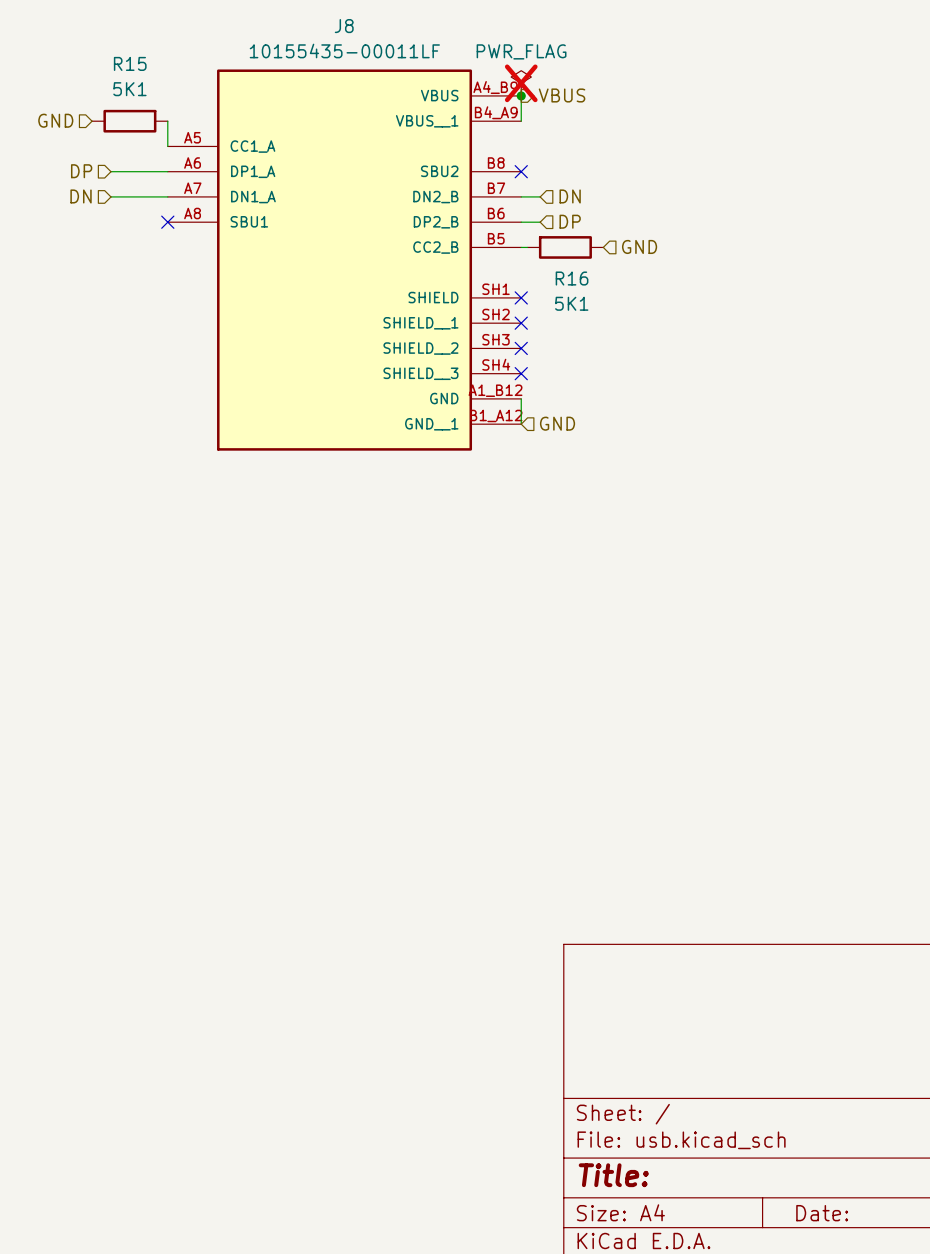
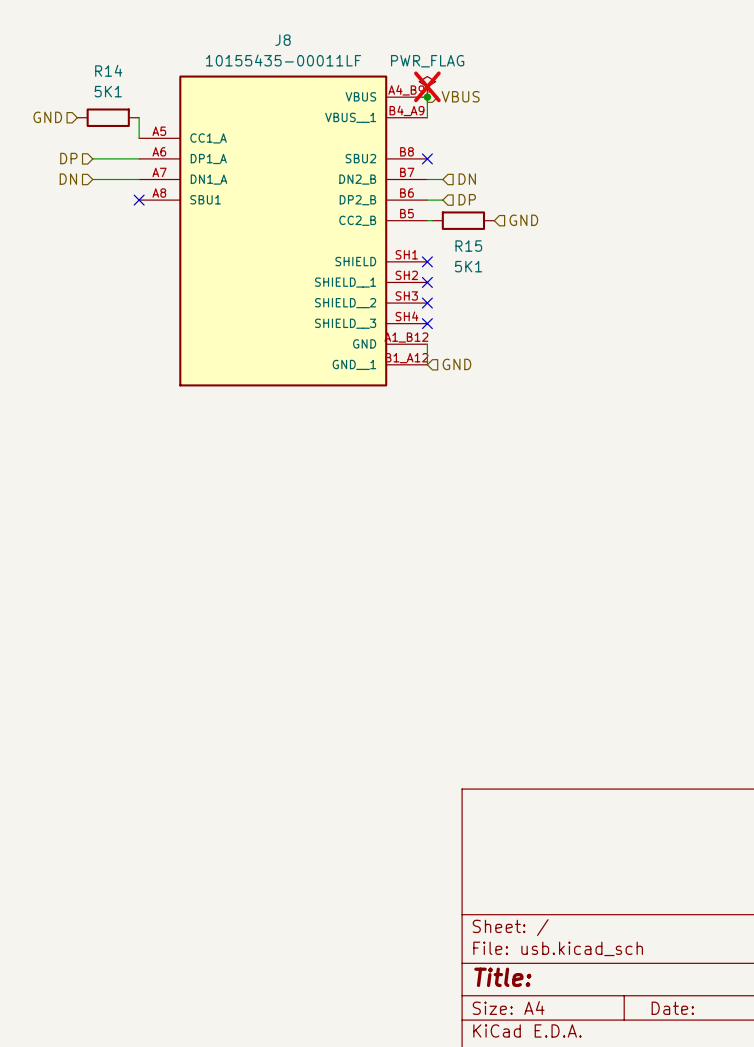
R15 name: R15 (130, 63) -> R14 (108, 70)
R16 name: R16 (572, 278) -> R15 (468, 246)

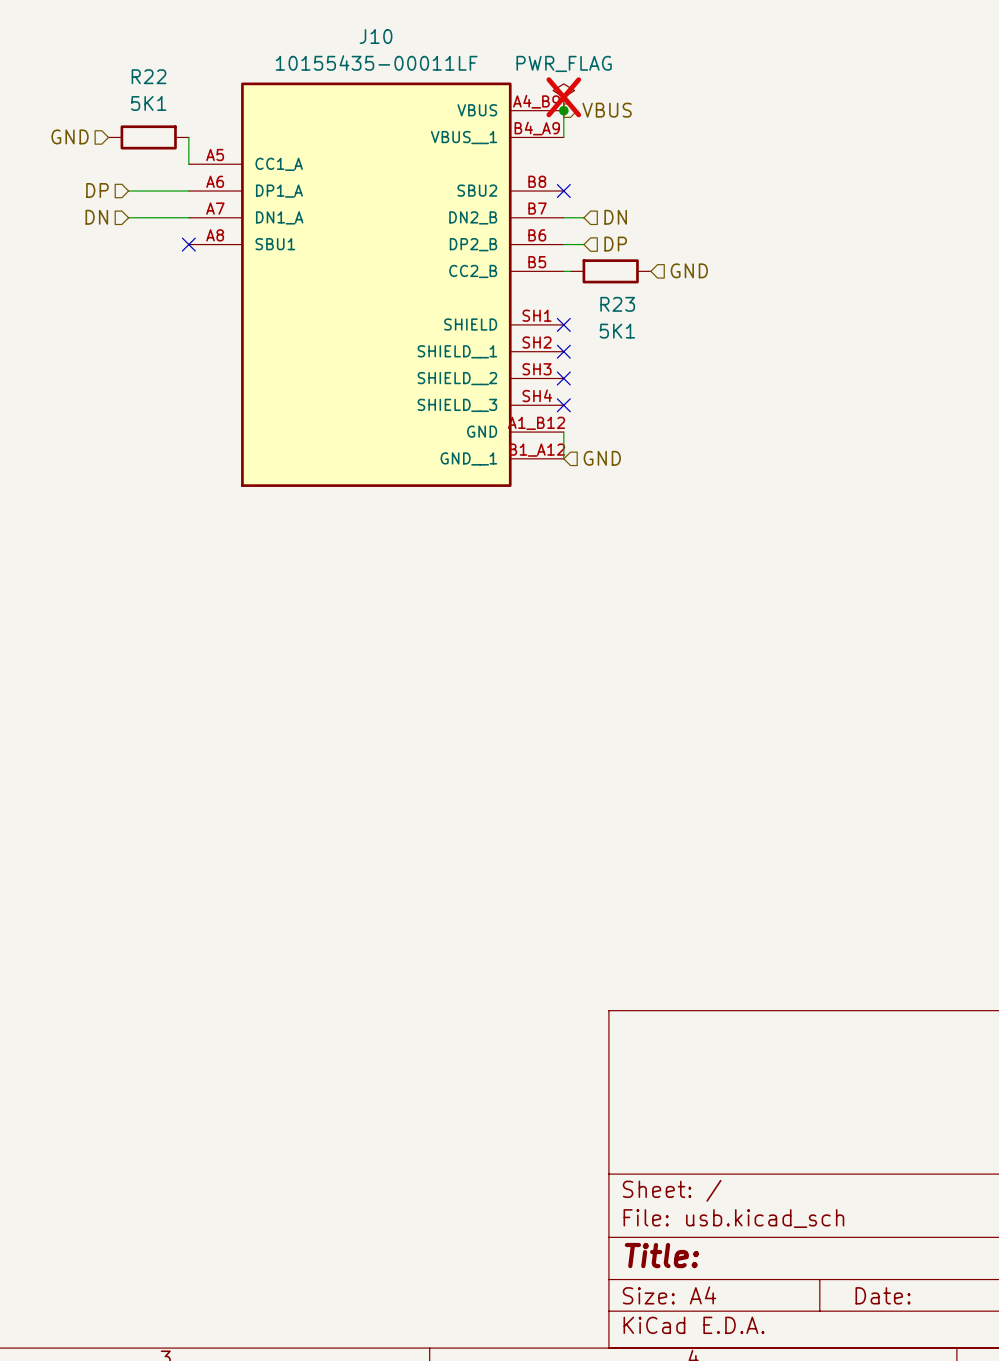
J8 name: J8 (283, 40) -> J10 (376, 36)
R14 name: R14 (108, 70) -> R22 (149, 76)
R15 name: R15 (468, 246) -> R23 (617, 304)

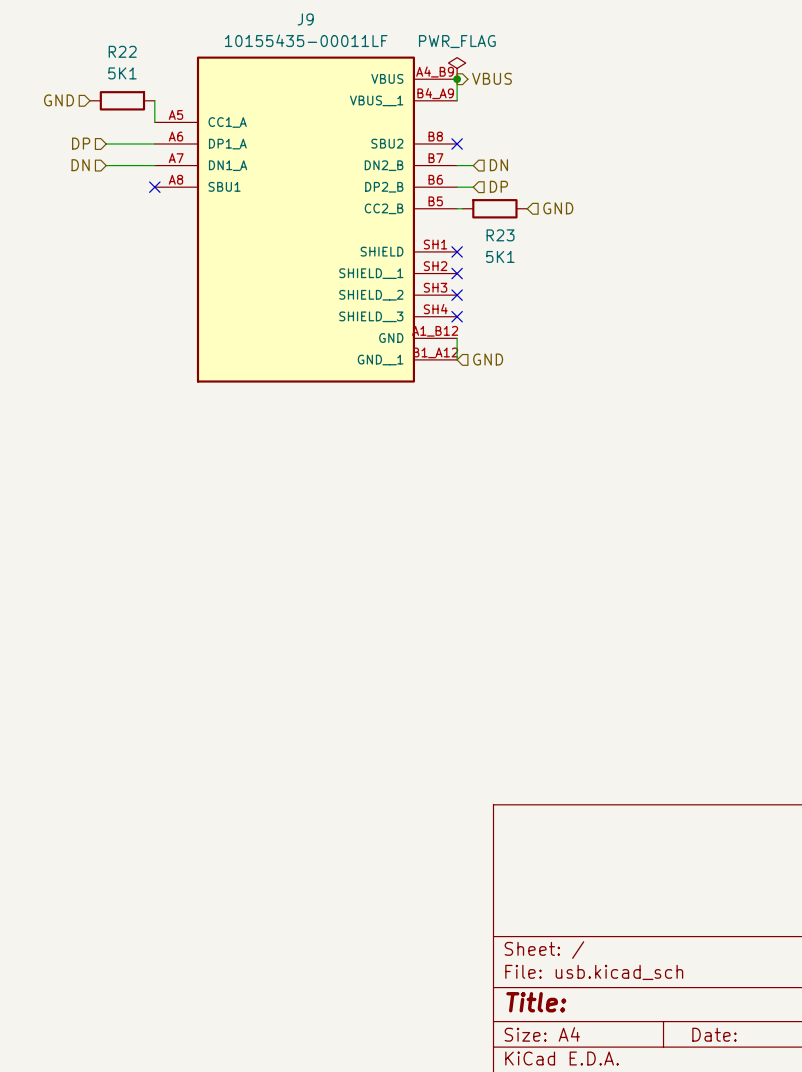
J10 name: J10 (376, 36) -> J9 (305, 19)
power symbol do-not-place cross: (563, 97) -> none

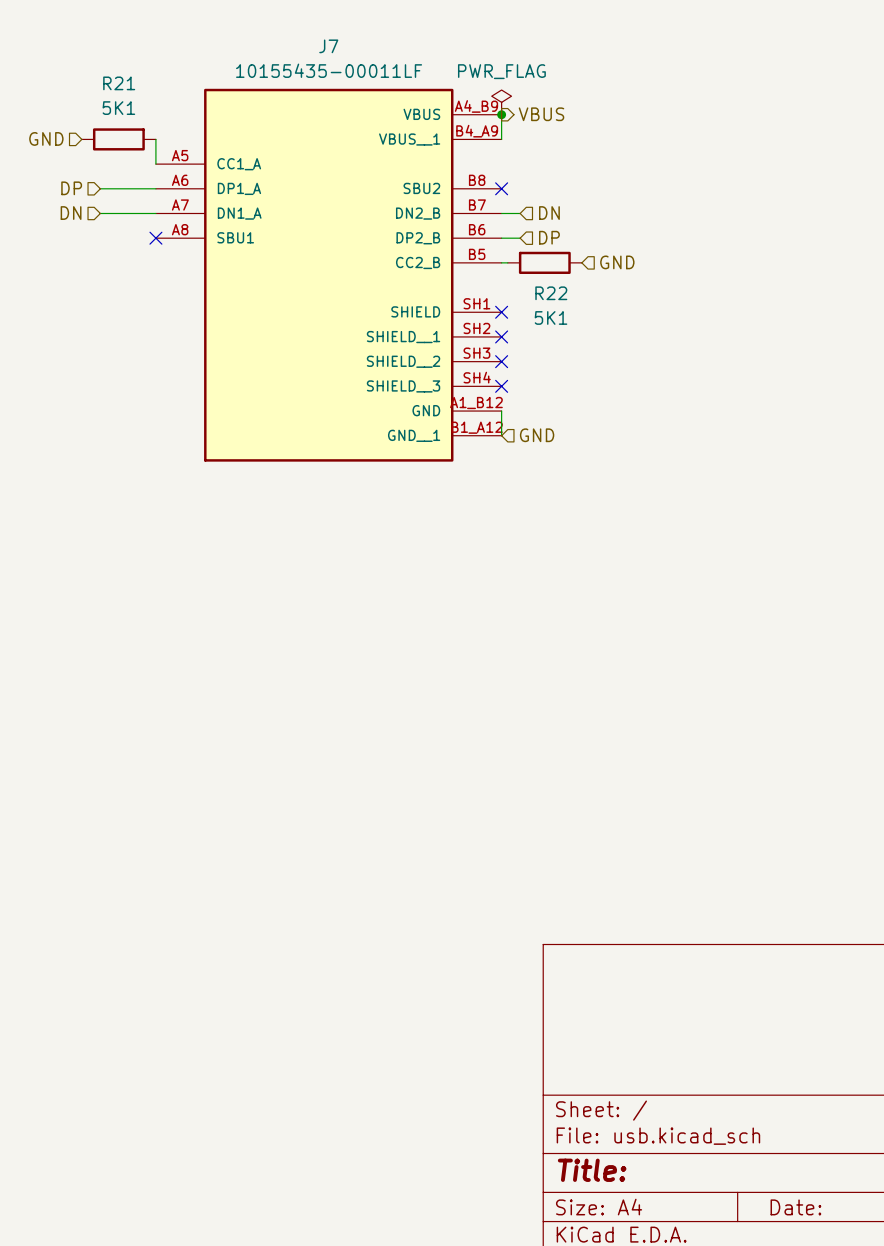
J9 name: J9 (305, 19) -> J7 (328, 46)
R22 name: R22 (122, 51) -> R21 (119, 83)
R23 name: R23 (500, 235) -> R22 (551, 293)

